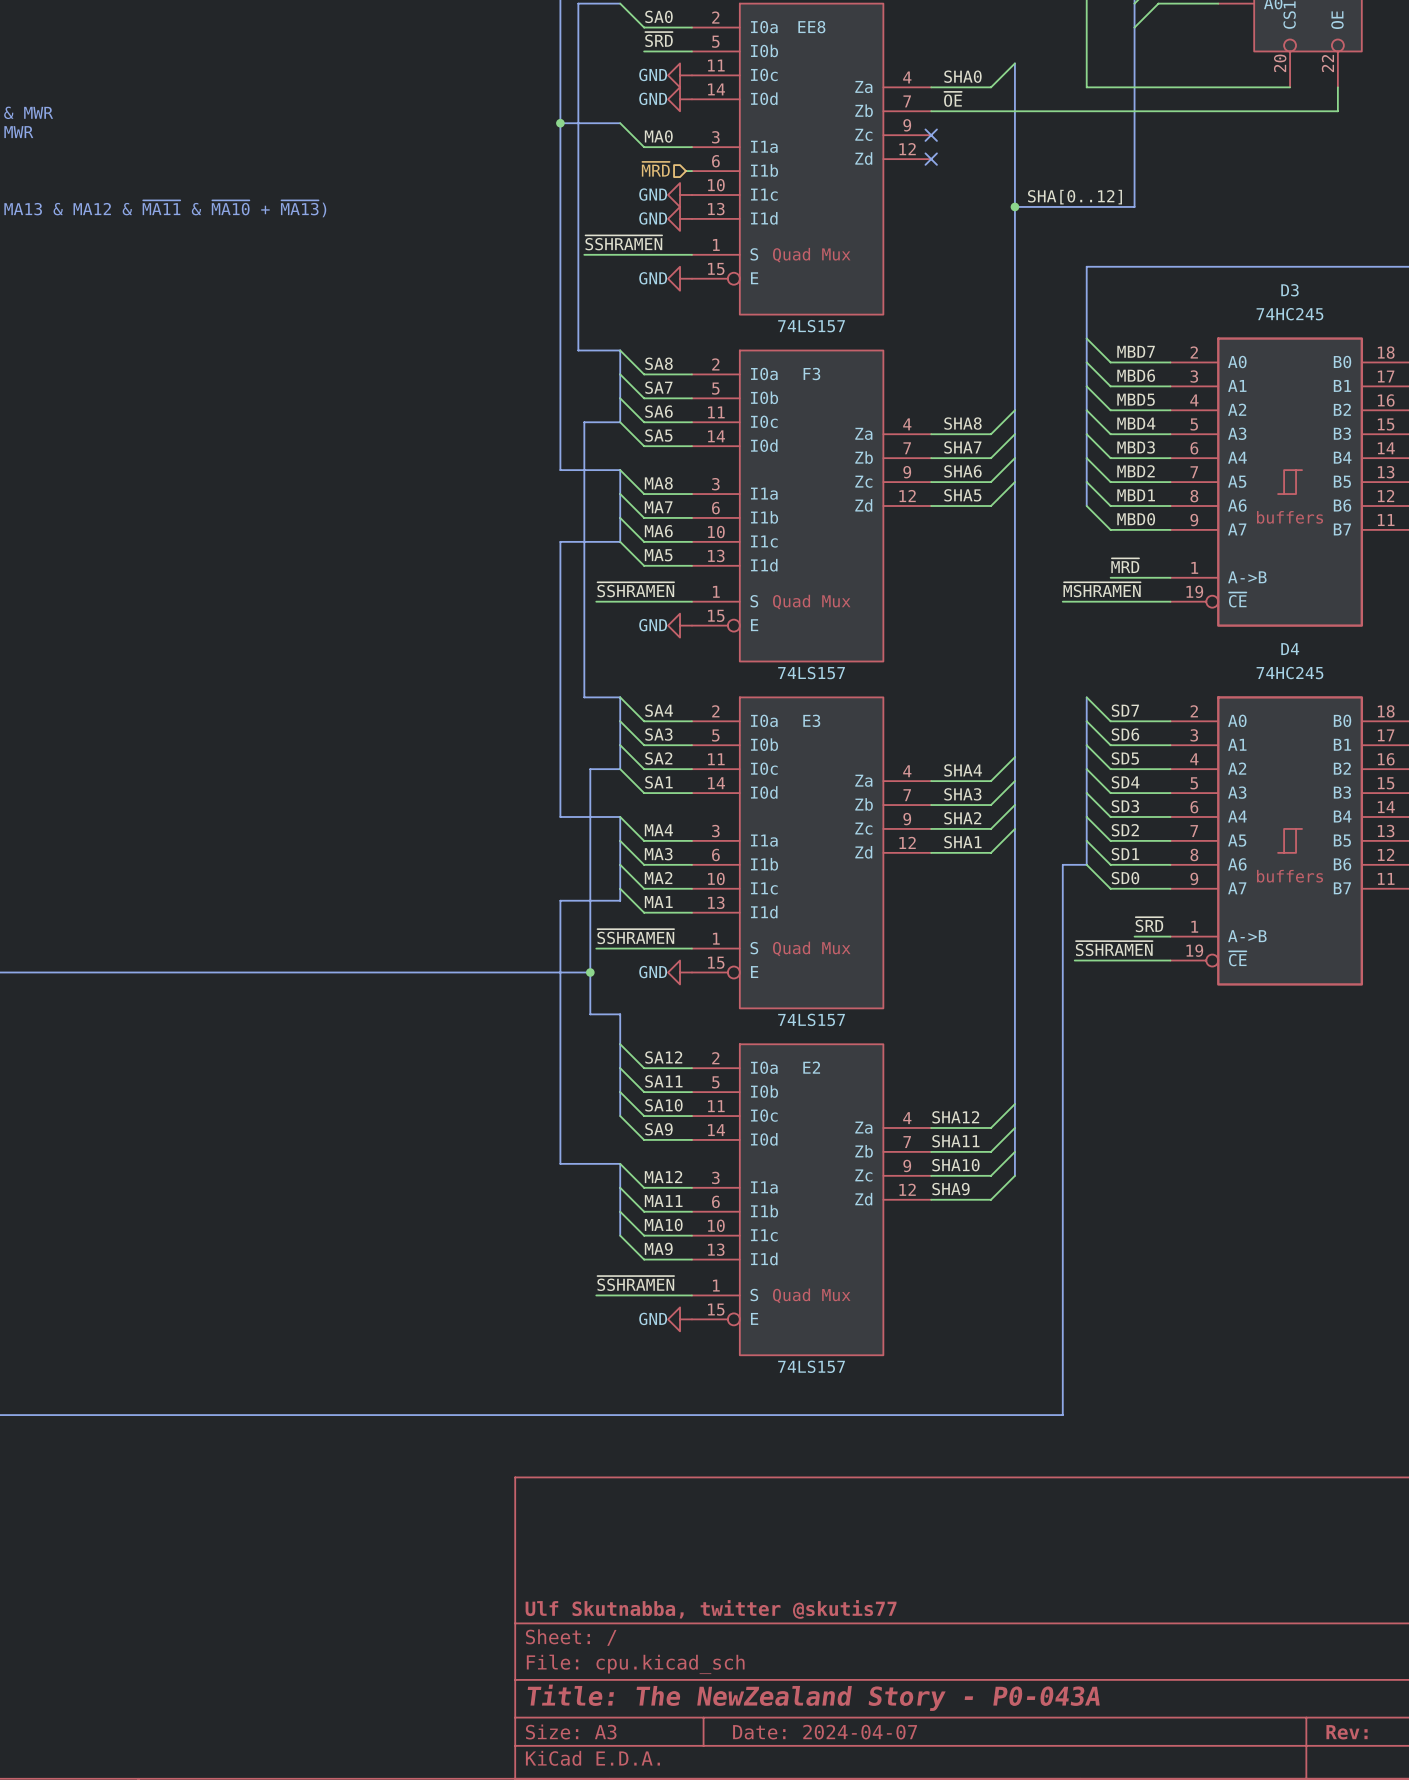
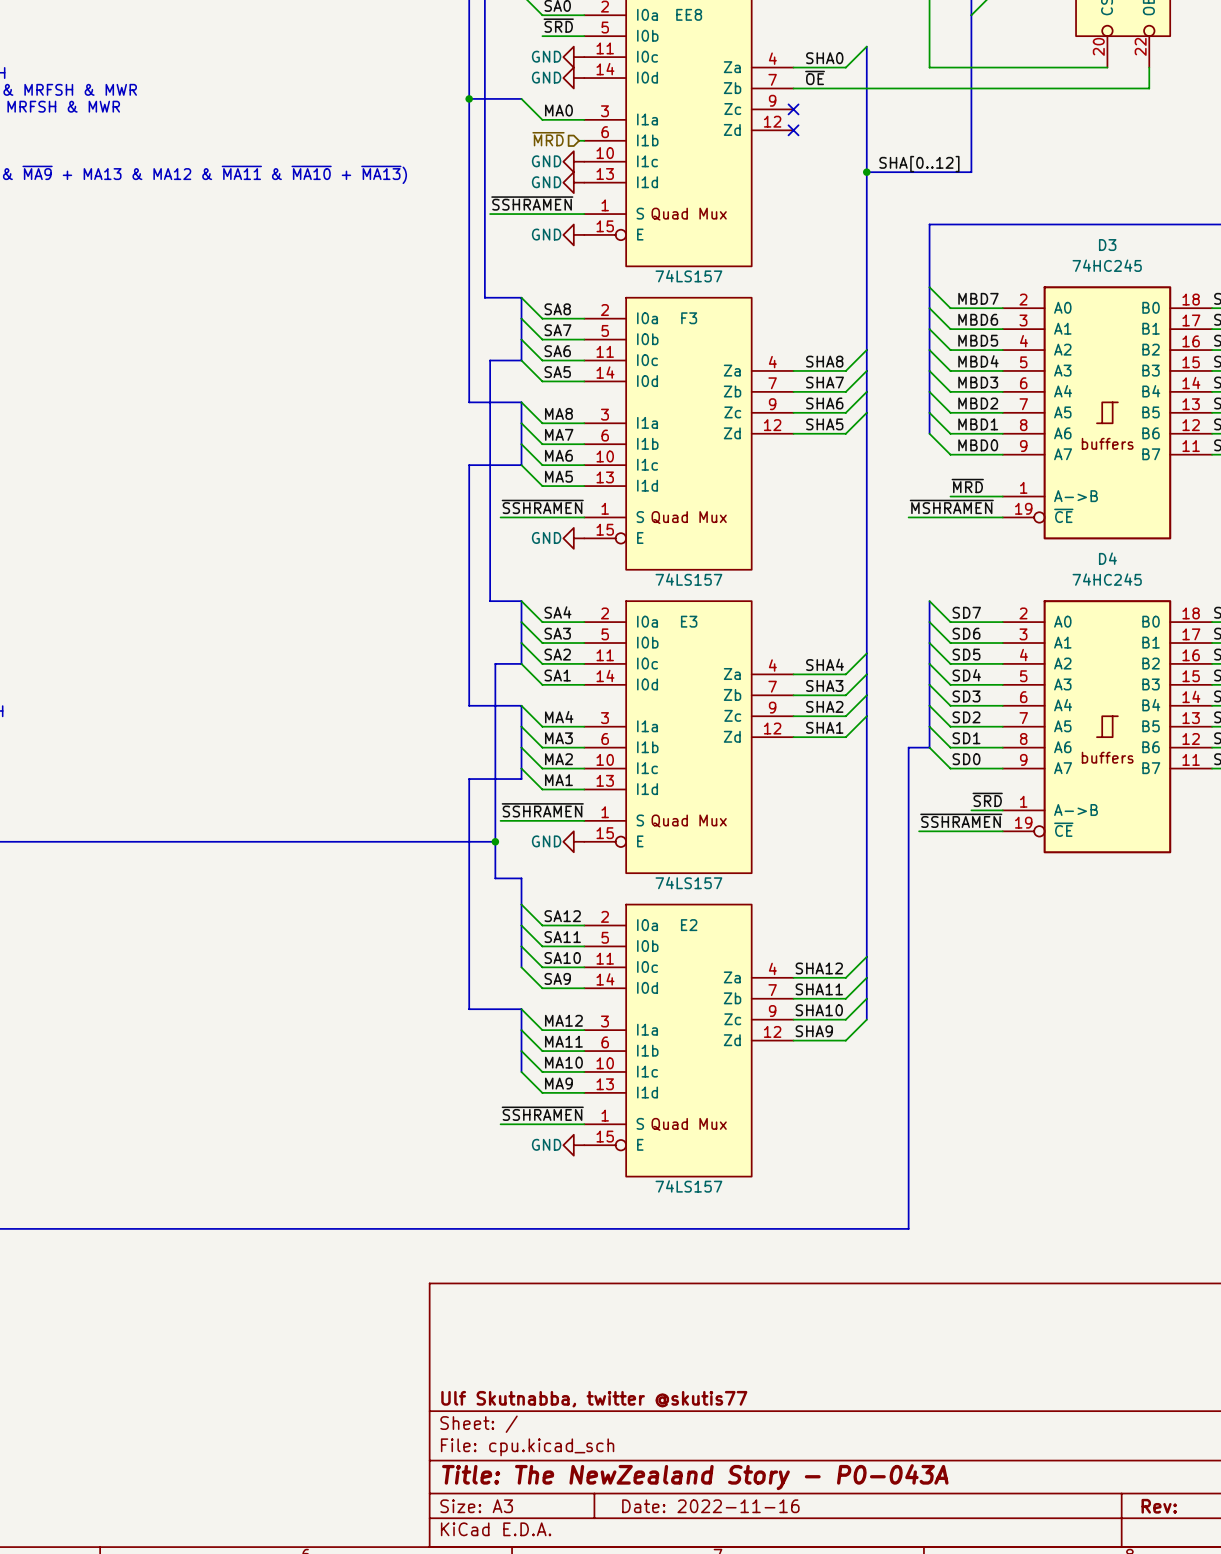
title block: Date: 2024-04-07 (825, 1732) -> Date: 2022-11-16 (710, 1506)

